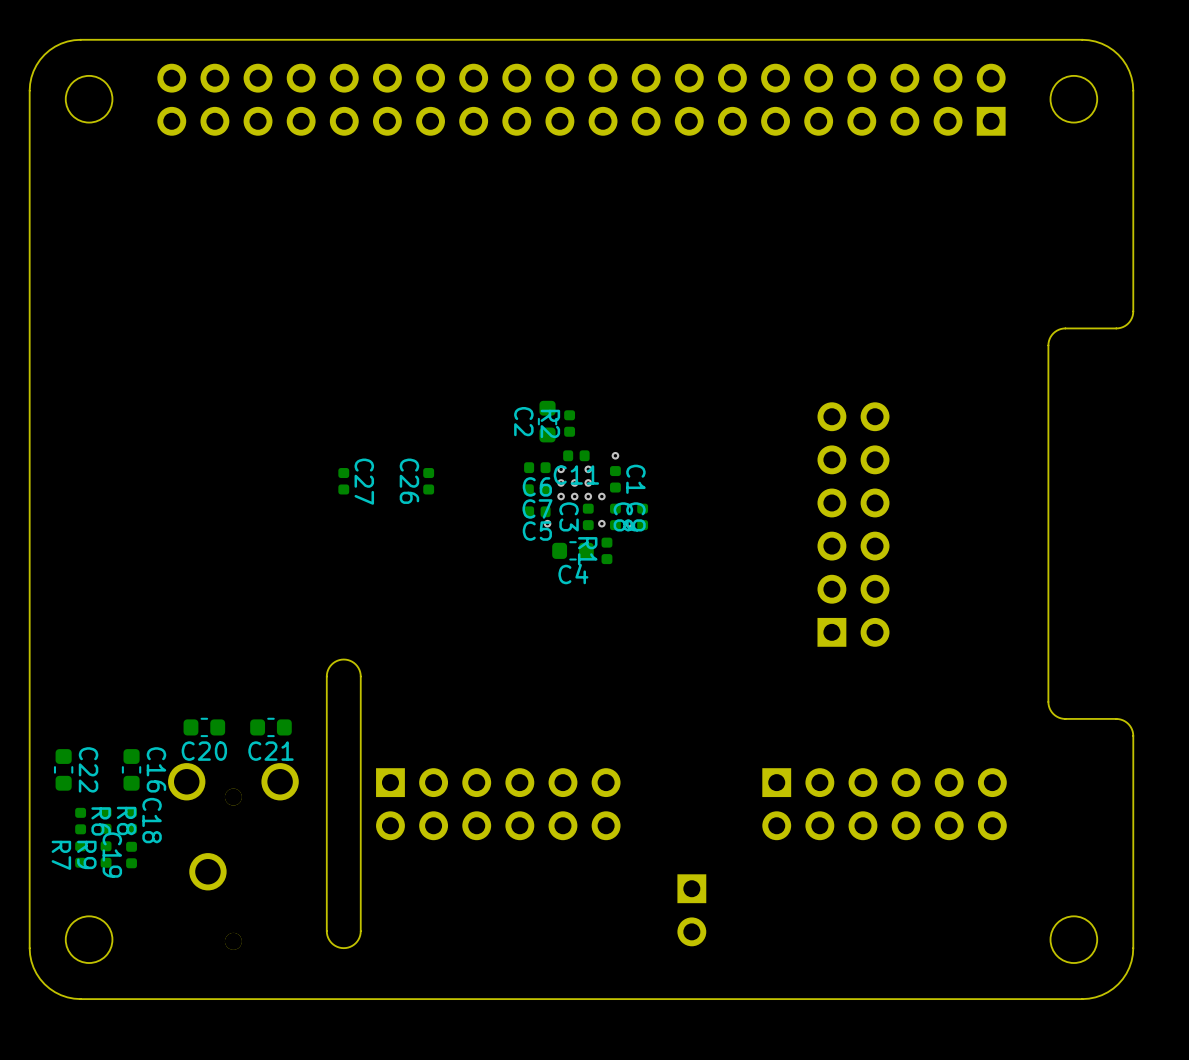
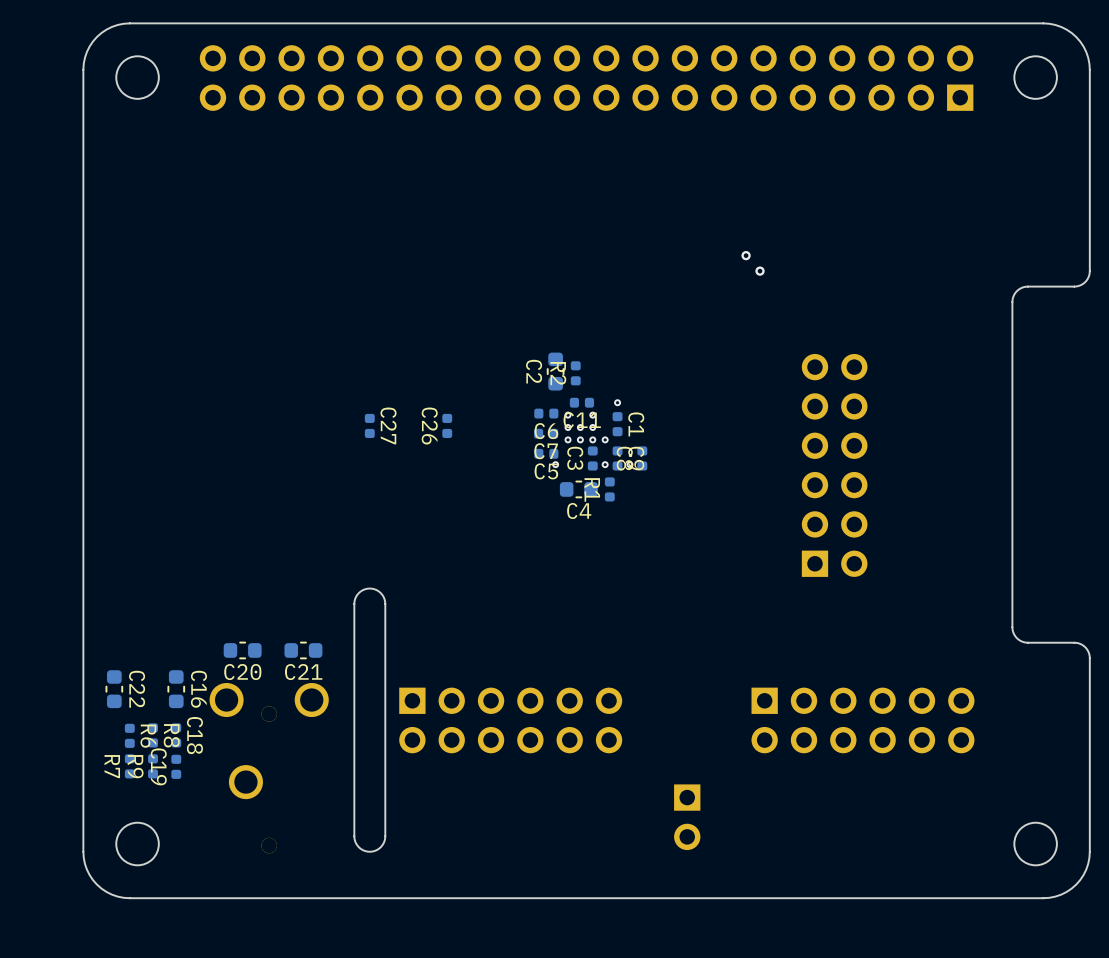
via: none -> (746, 255)
via: none -> (760, 271)

